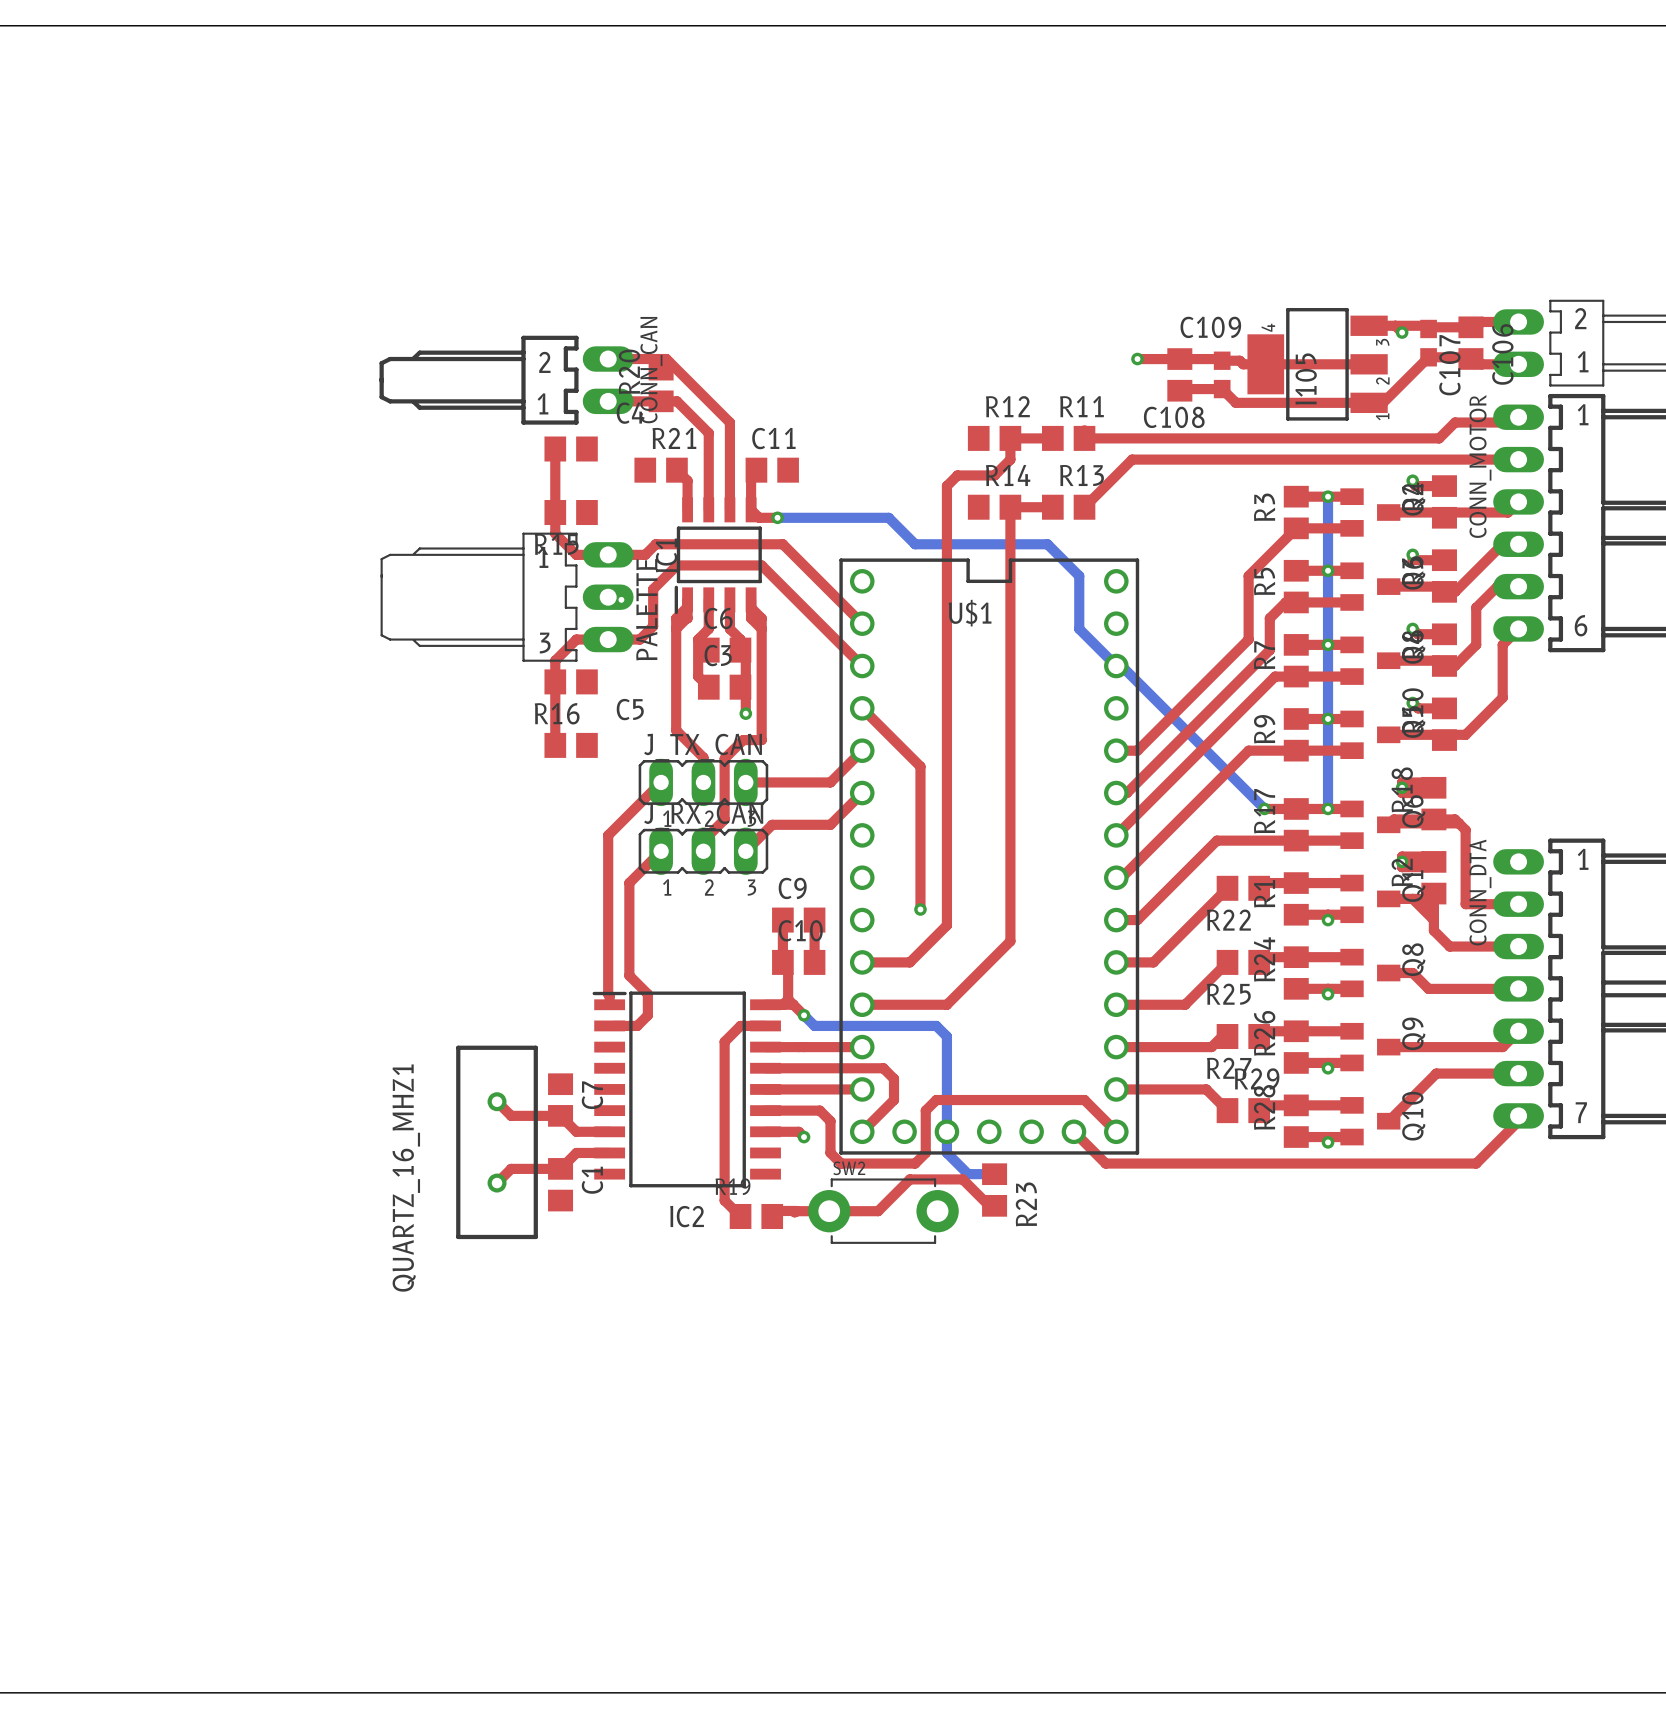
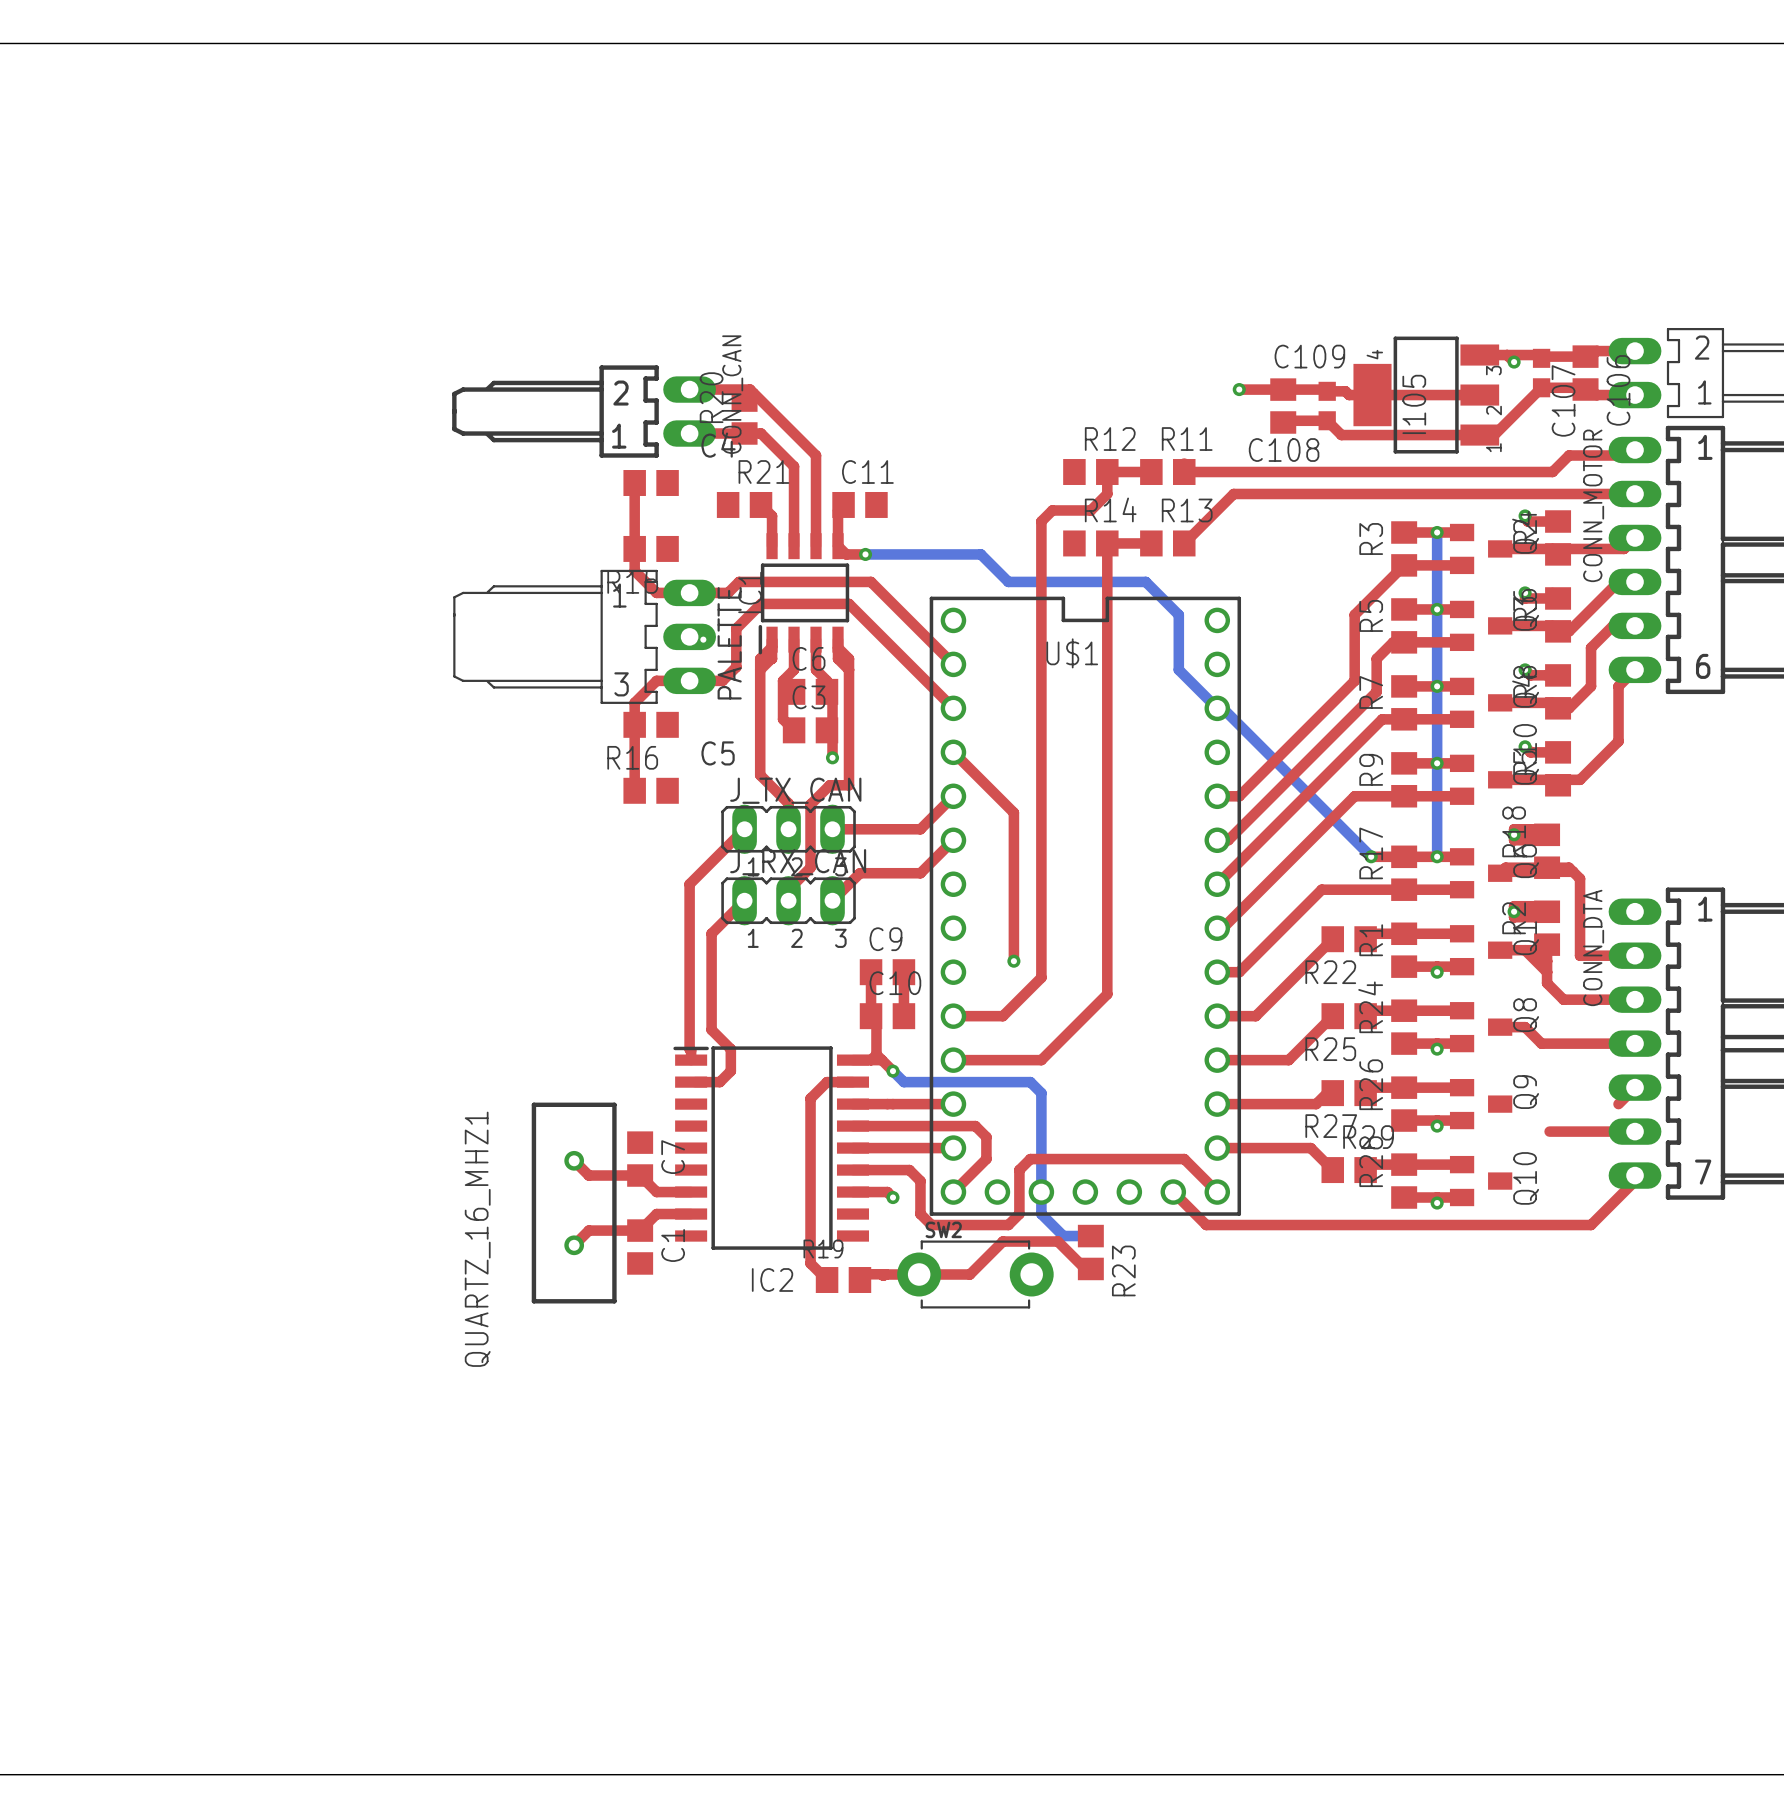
top track: (1388, 1047) (1502, 1047) -> none
top track: (1436, 1073) (1388, 1121) -> none

